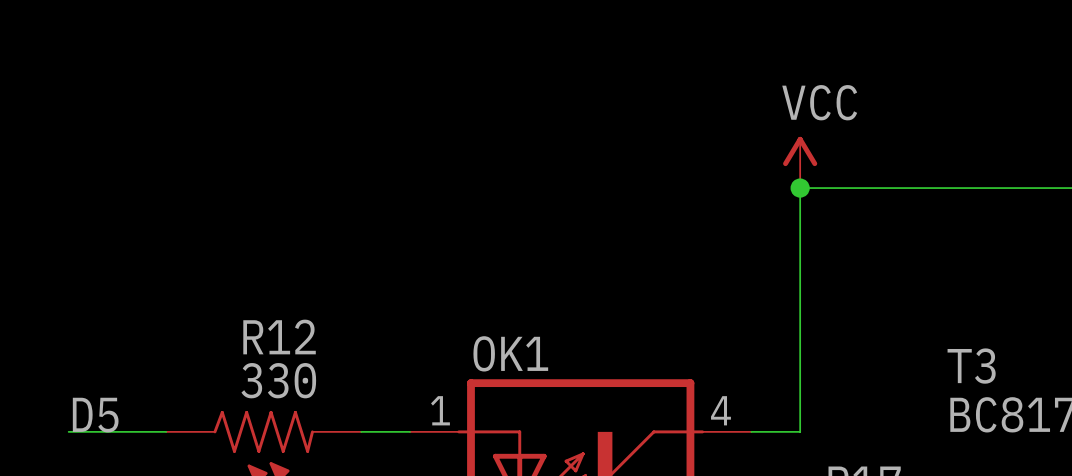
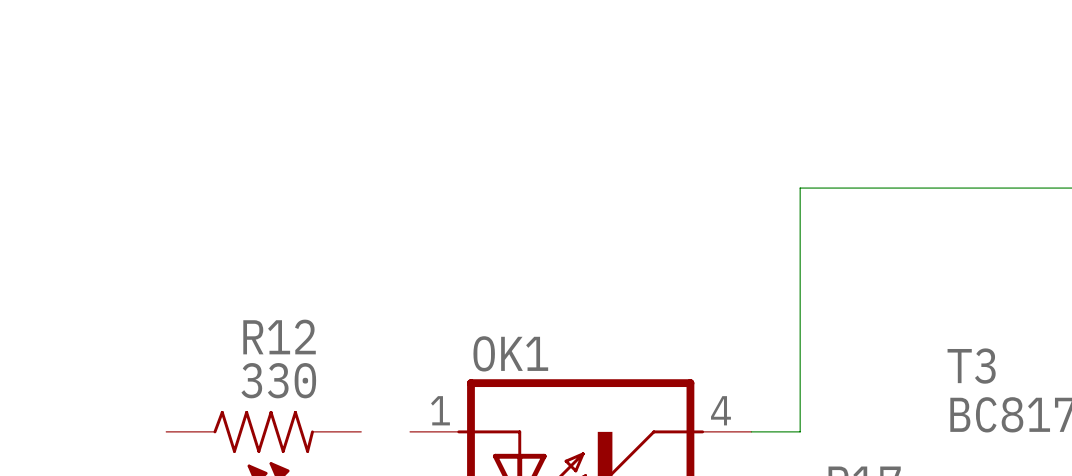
power symbol: VCC (800, 162) -> none
junction: (800, 188) -> none
label: D5 (95, 415) -> none
wire: (68, 431) (166, 431) -> none
wire: (361, 431) (410, 431) -> none

